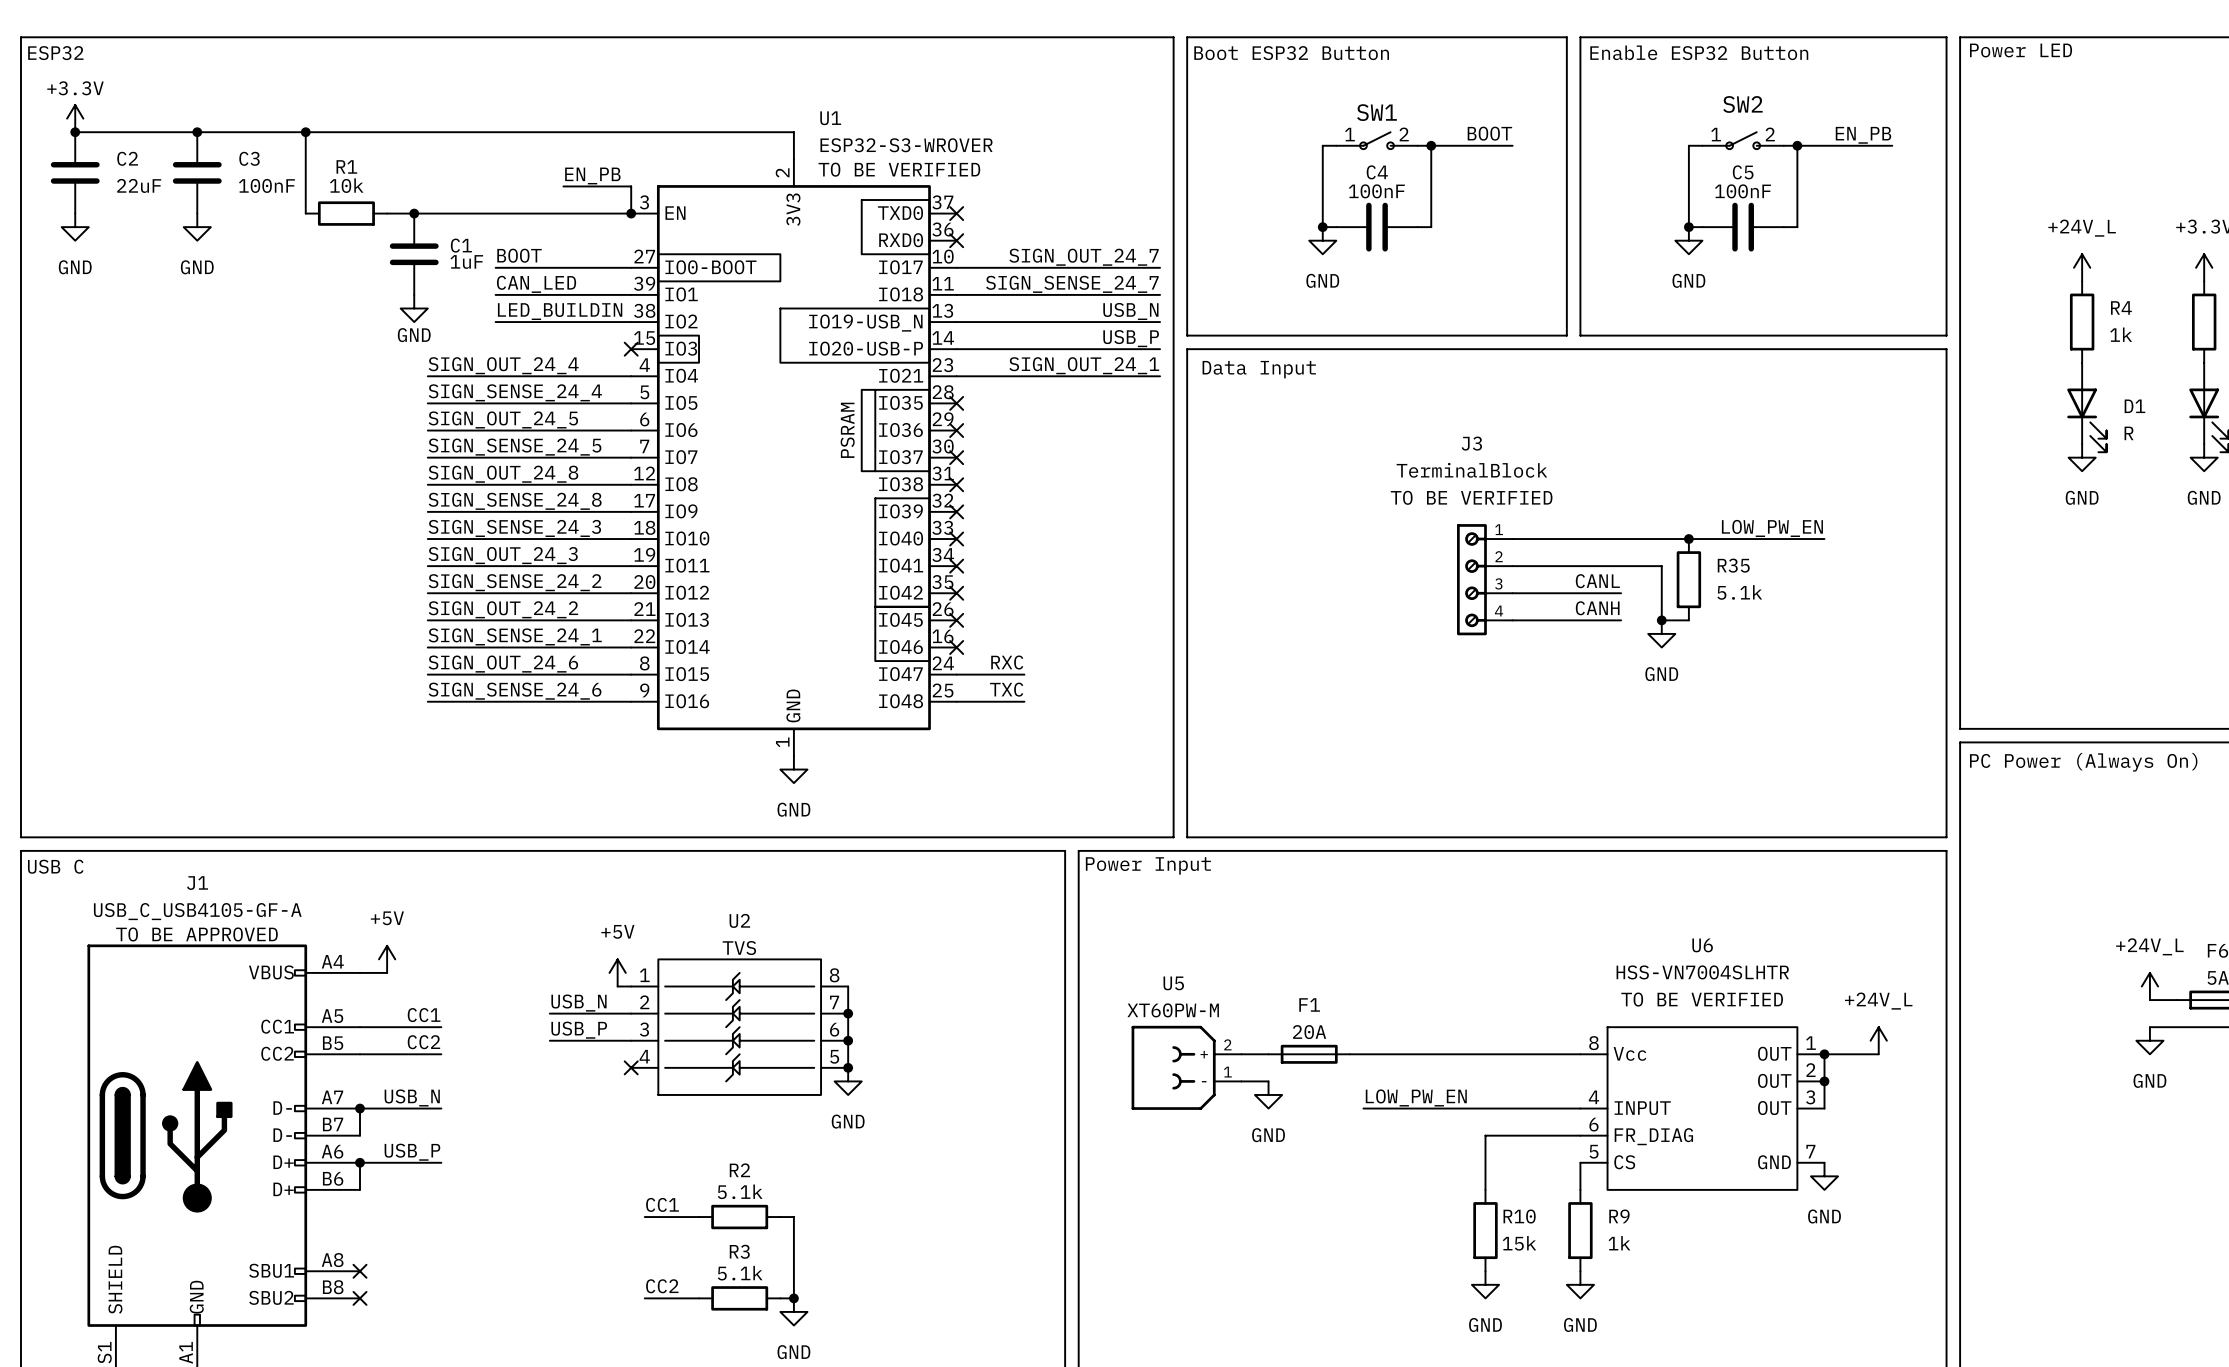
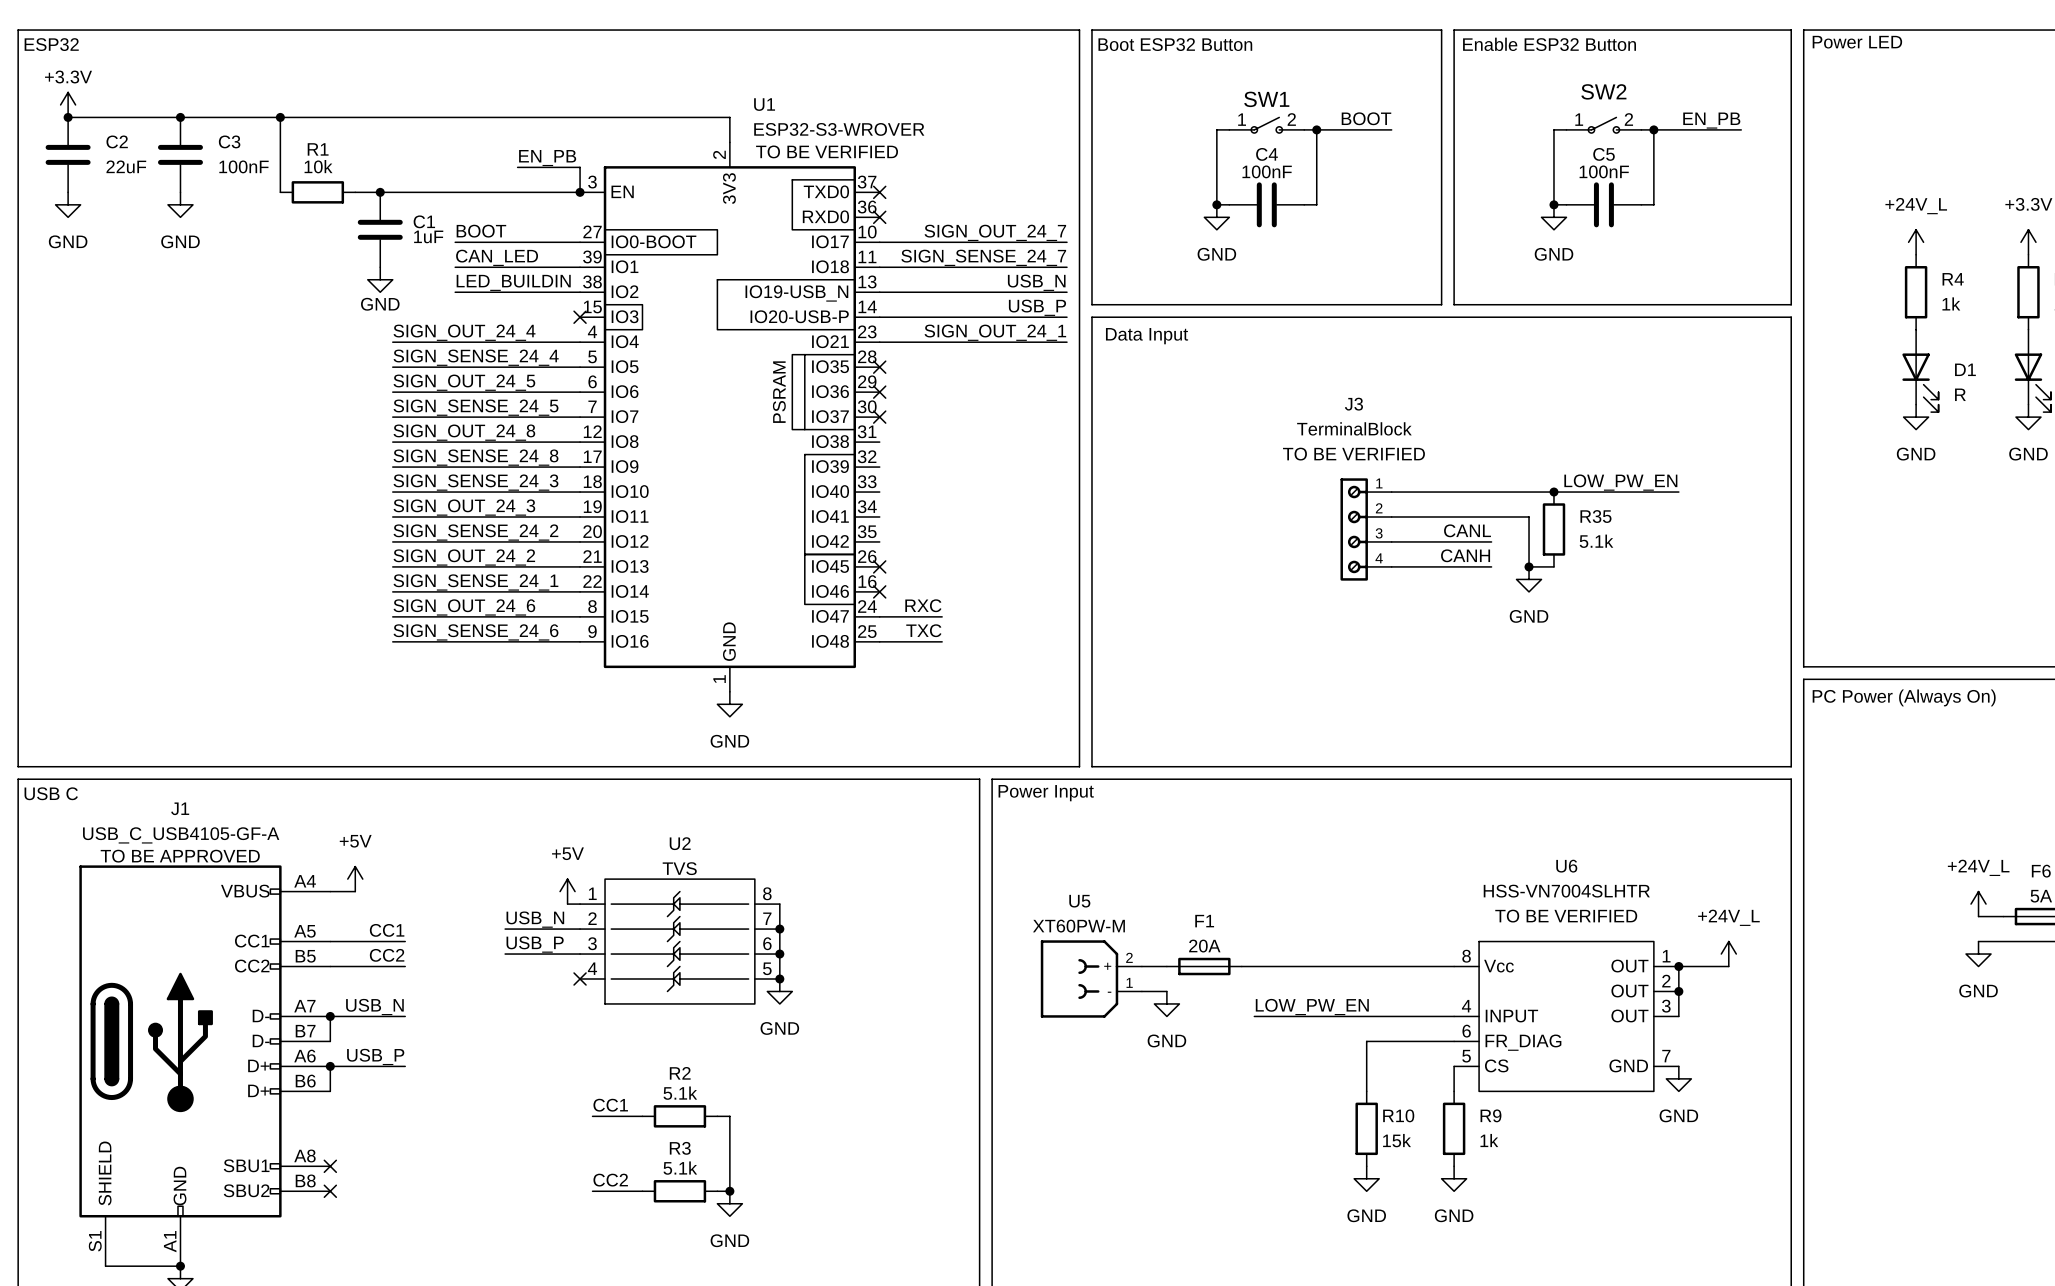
no-connect mark: (956, 484) -> none
no-connect mark: (956, 511) -> none
no-connect mark: (956, 539) -> none
no-connect mark: (956, 566) -> none
no-connect mark: (956, 593) -> none

